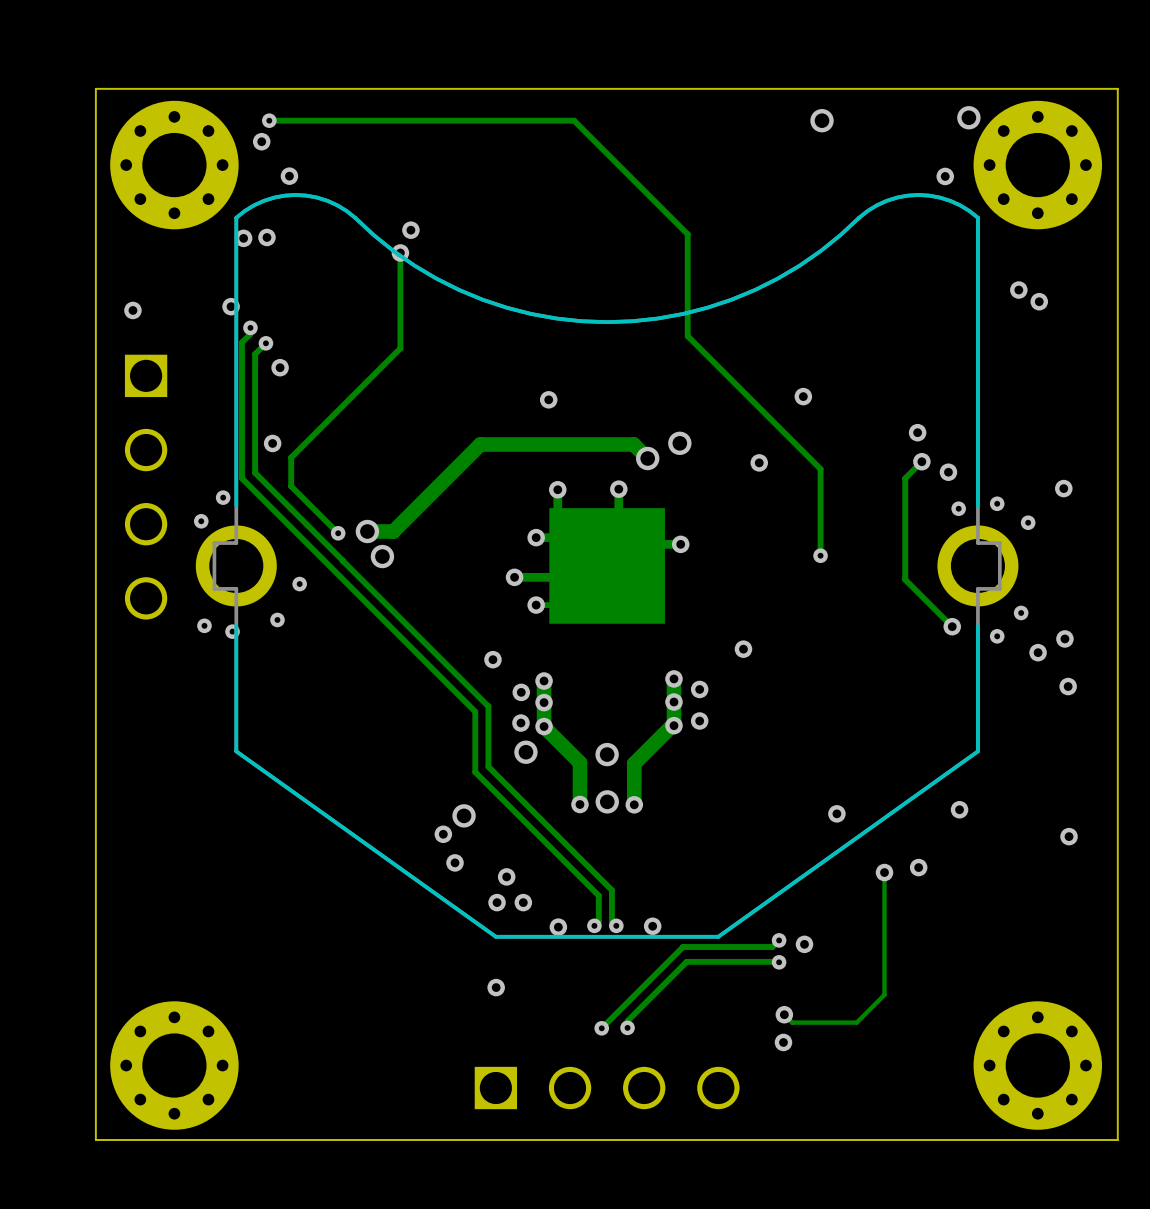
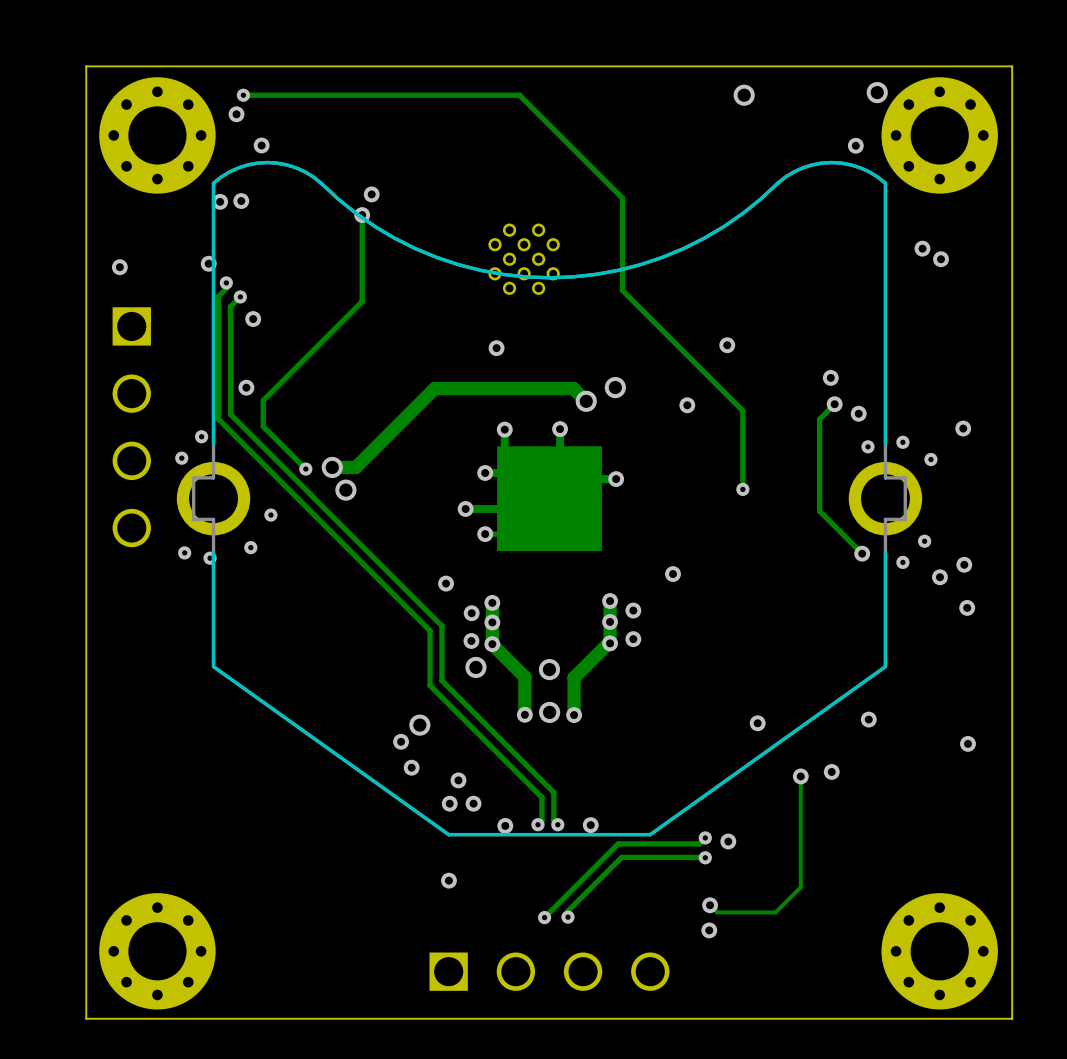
part: none -> (524, 259)

